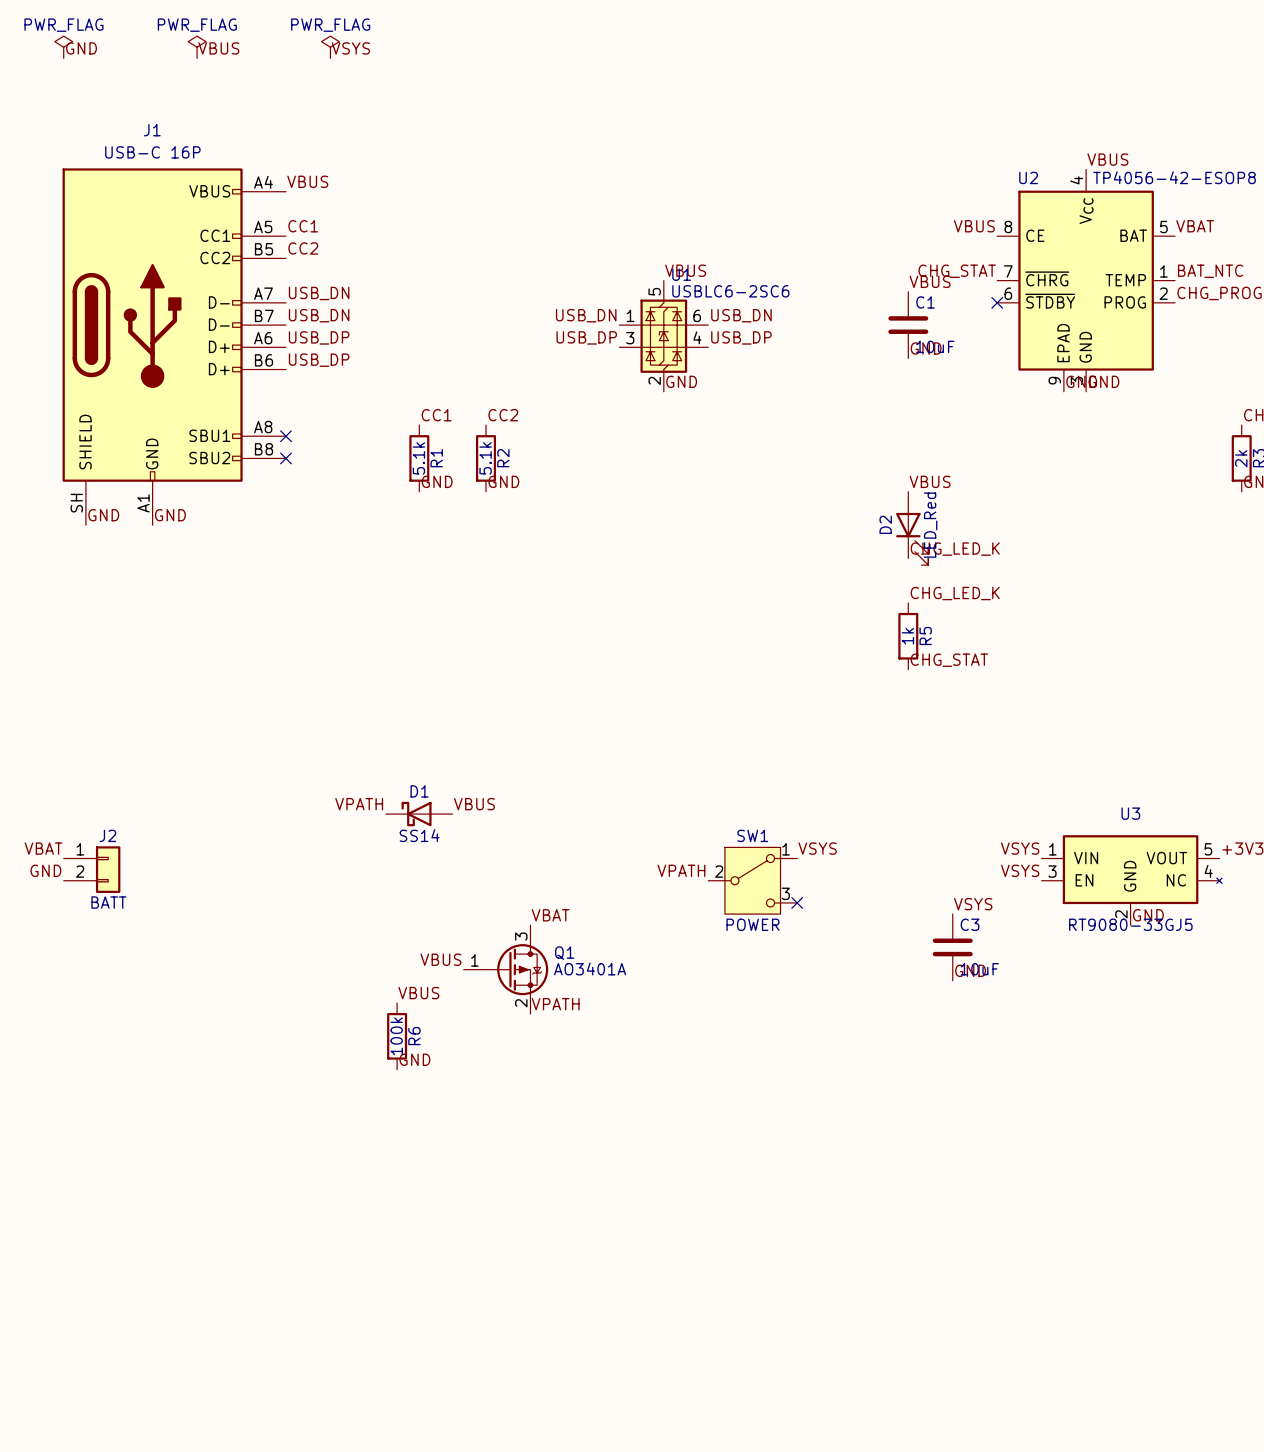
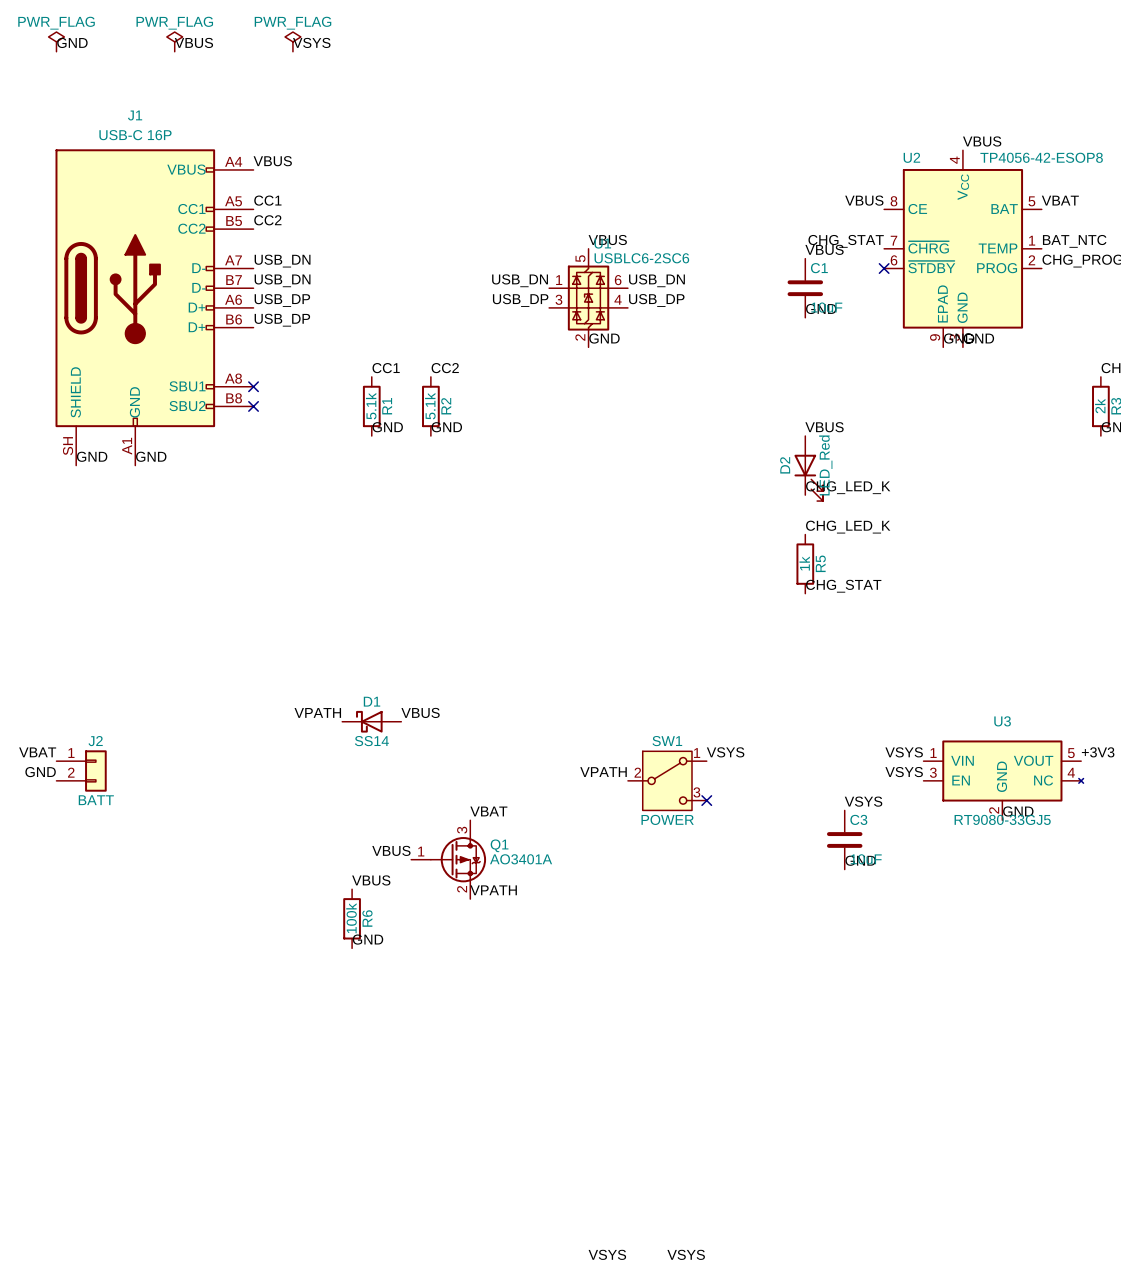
label: none -> VSYS (607, 1254)
label: none -> VSYS (686, 1254)

